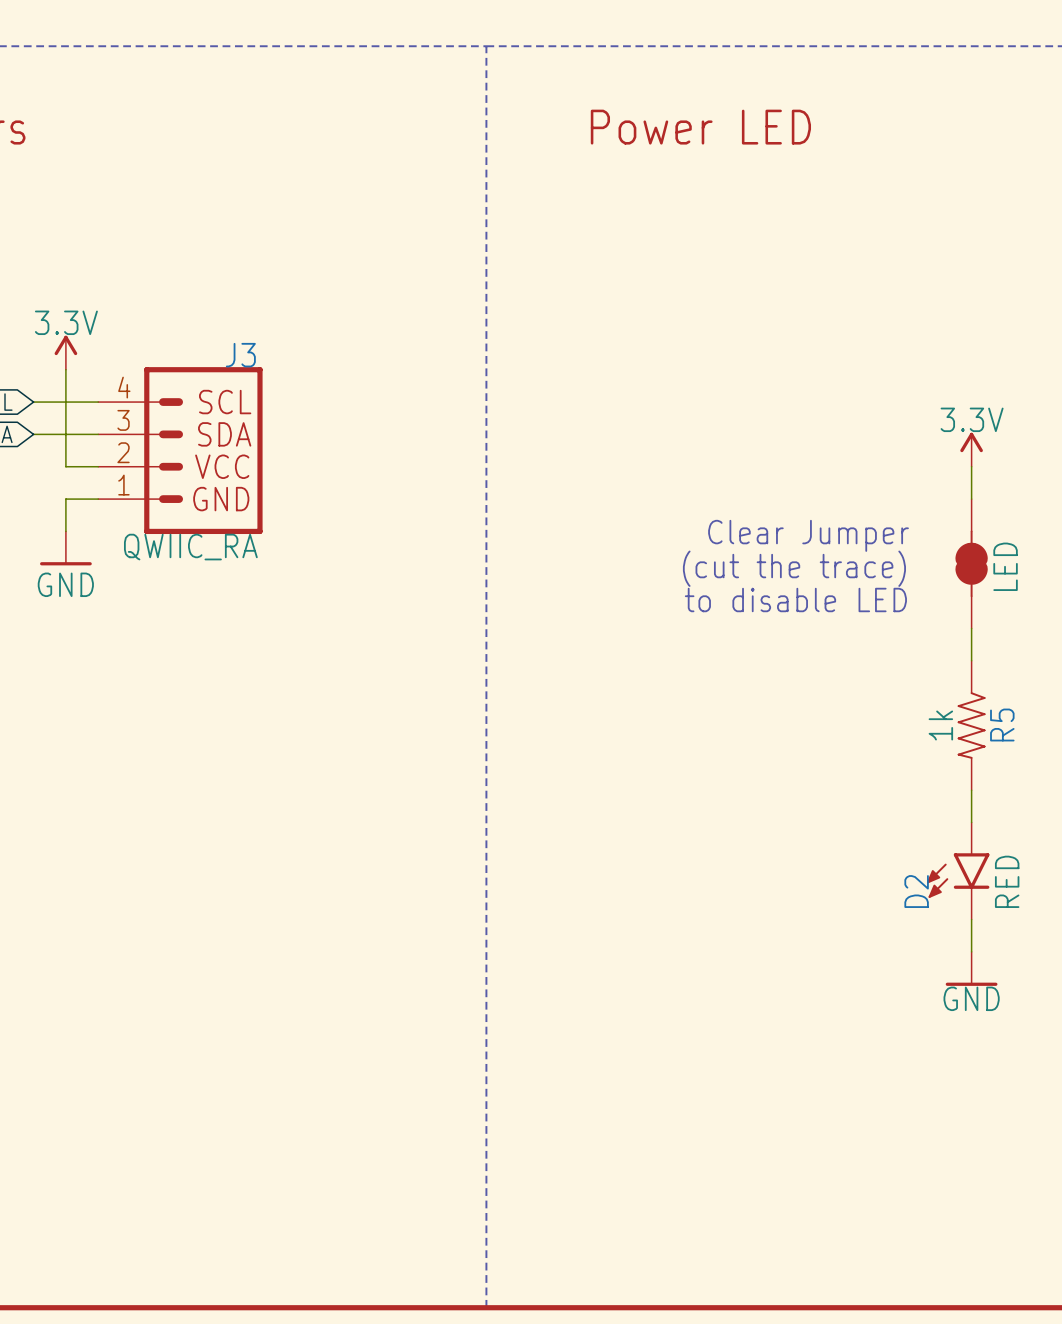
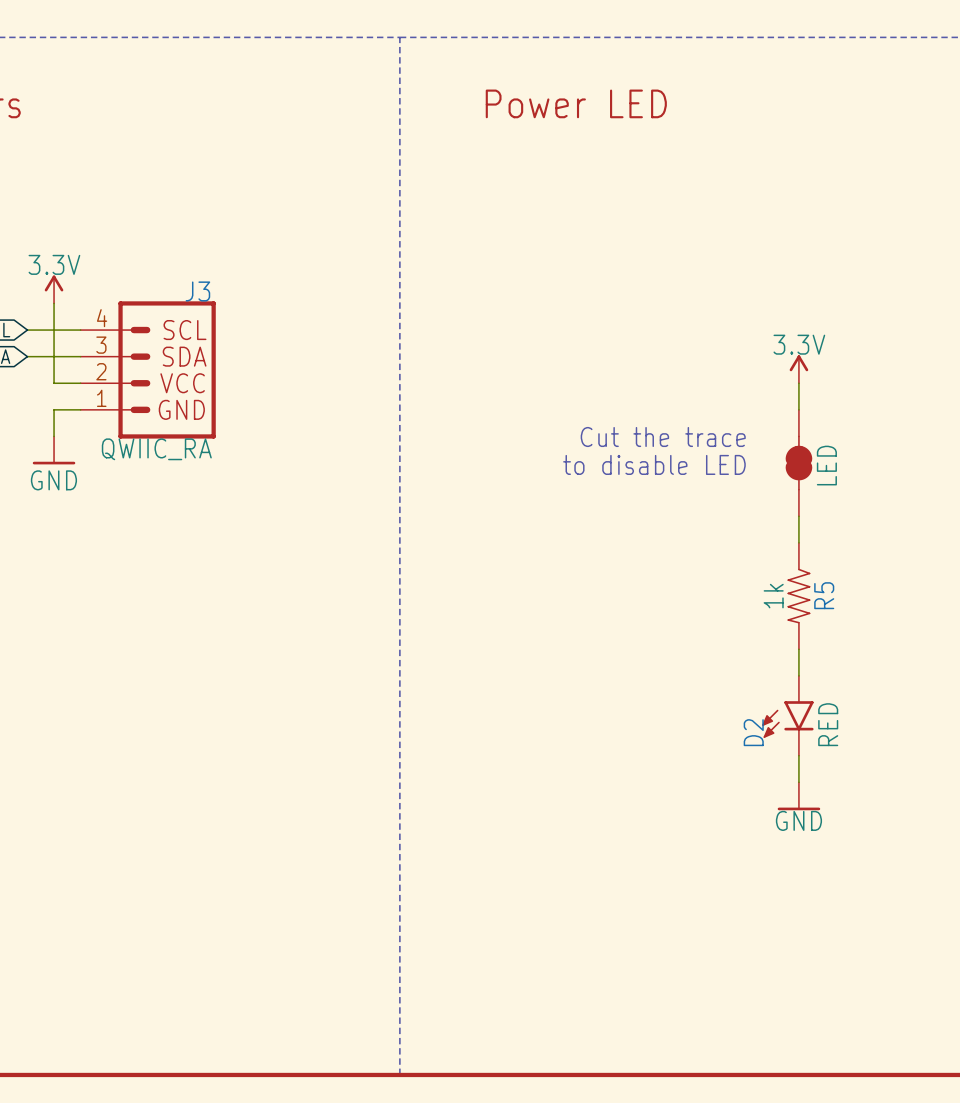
text: Clear Jumper (808, 535) -> Cut the trace (663, 436)
text: (cut the trace) (794, 568) -> to disable LED (654, 464)
text: to disable LED (795, 600) -> none

